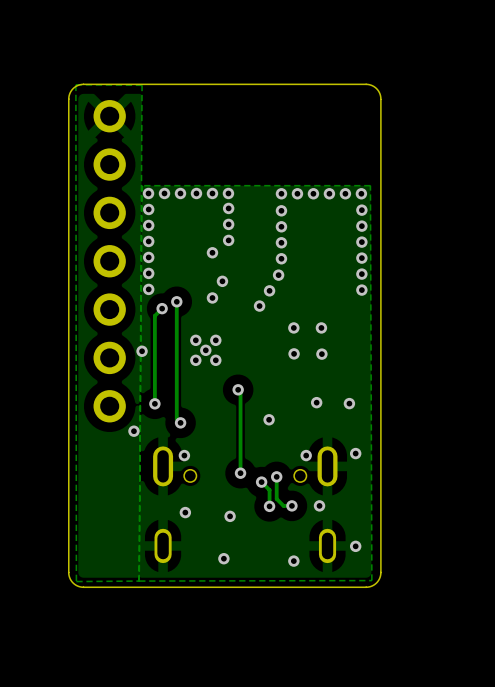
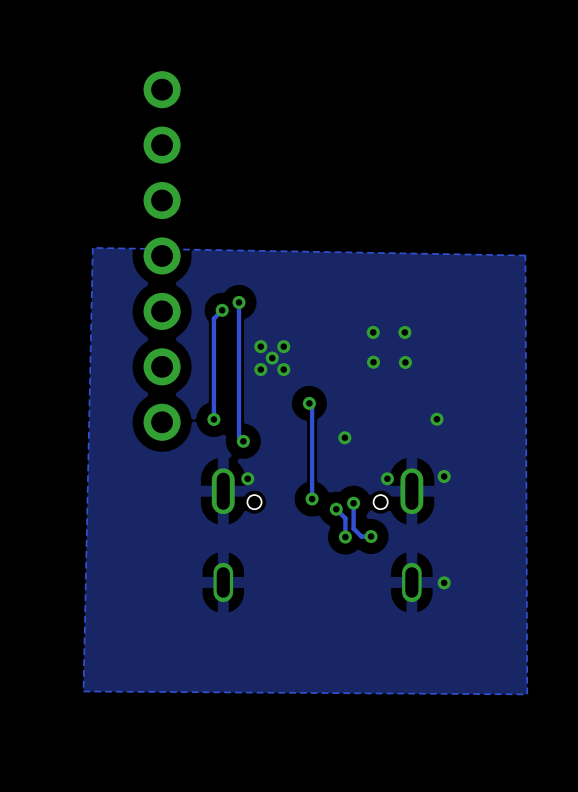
board edge: (380, 99) (376, 88) (366, 84) (83, 84) (75, 86) (71, 91) (68, 99) (68, 572) (70, 578) (75, 585) (83, 587) (366, 587) (372, 585) (378, 580) (380, 572) (380, 99) -> none
via: (148, 193) -> none
via: (164, 193) -> none
via: (180, 193) -> none
via: (196, 193) -> none
via: (212, 193) -> none
via: (228, 193) -> none
via: (281, 193) -> none
via: (297, 193) -> none
via: (313, 193) -> none
via: (329, 193) -> none
via: (345, 193) -> none
via: (361, 193) -> none
via: (228, 208) -> none
via: (148, 209) -> none
via: (281, 210) -> none
via: (361, 210) -> none
via: (228, 224) -> none
via: (148, 225) -> none
via: (281, 226) -> none
via: (361, 226) -> none
via: (228, 240) -> none
via: (148, 241) -> none
via: (281, 242) -> none
via: (361, 242) -> none
via: (212, 252) -> none
zone outline: none -> (92, 247) (525, 255) (527, 694) (83, 691) (92, 247)
via: (148, 257) -> none
via: (281, 258) -> none
via: (361, 258) -> none
via: (148, 273) -> none
via: (361, 274) -> none
via: (278, 275) -> none
via: (222, 281) -> none
via: (148, 289) -> none
via: (269, 290) -> none
via: (361, 290) -> none
via: (212, 297) -> none
via: (259, 306) -> none
via: (142, 351) -> none
via: (316, 402) -> none
via: (133, 431) -> none
via: (319, 505) -> none
via: (185, 512) -> none
via: (230, 516) -> none
via: (223, 558) -> none
via: (293, 561) -> none
zone outline: (139, 581) (142, 185) (370, 185) (371, 580) (139, 581) -> none
zone outline: (139, 581) (142, 85) (75, 84) (76, 581) (139, 581) -> none

